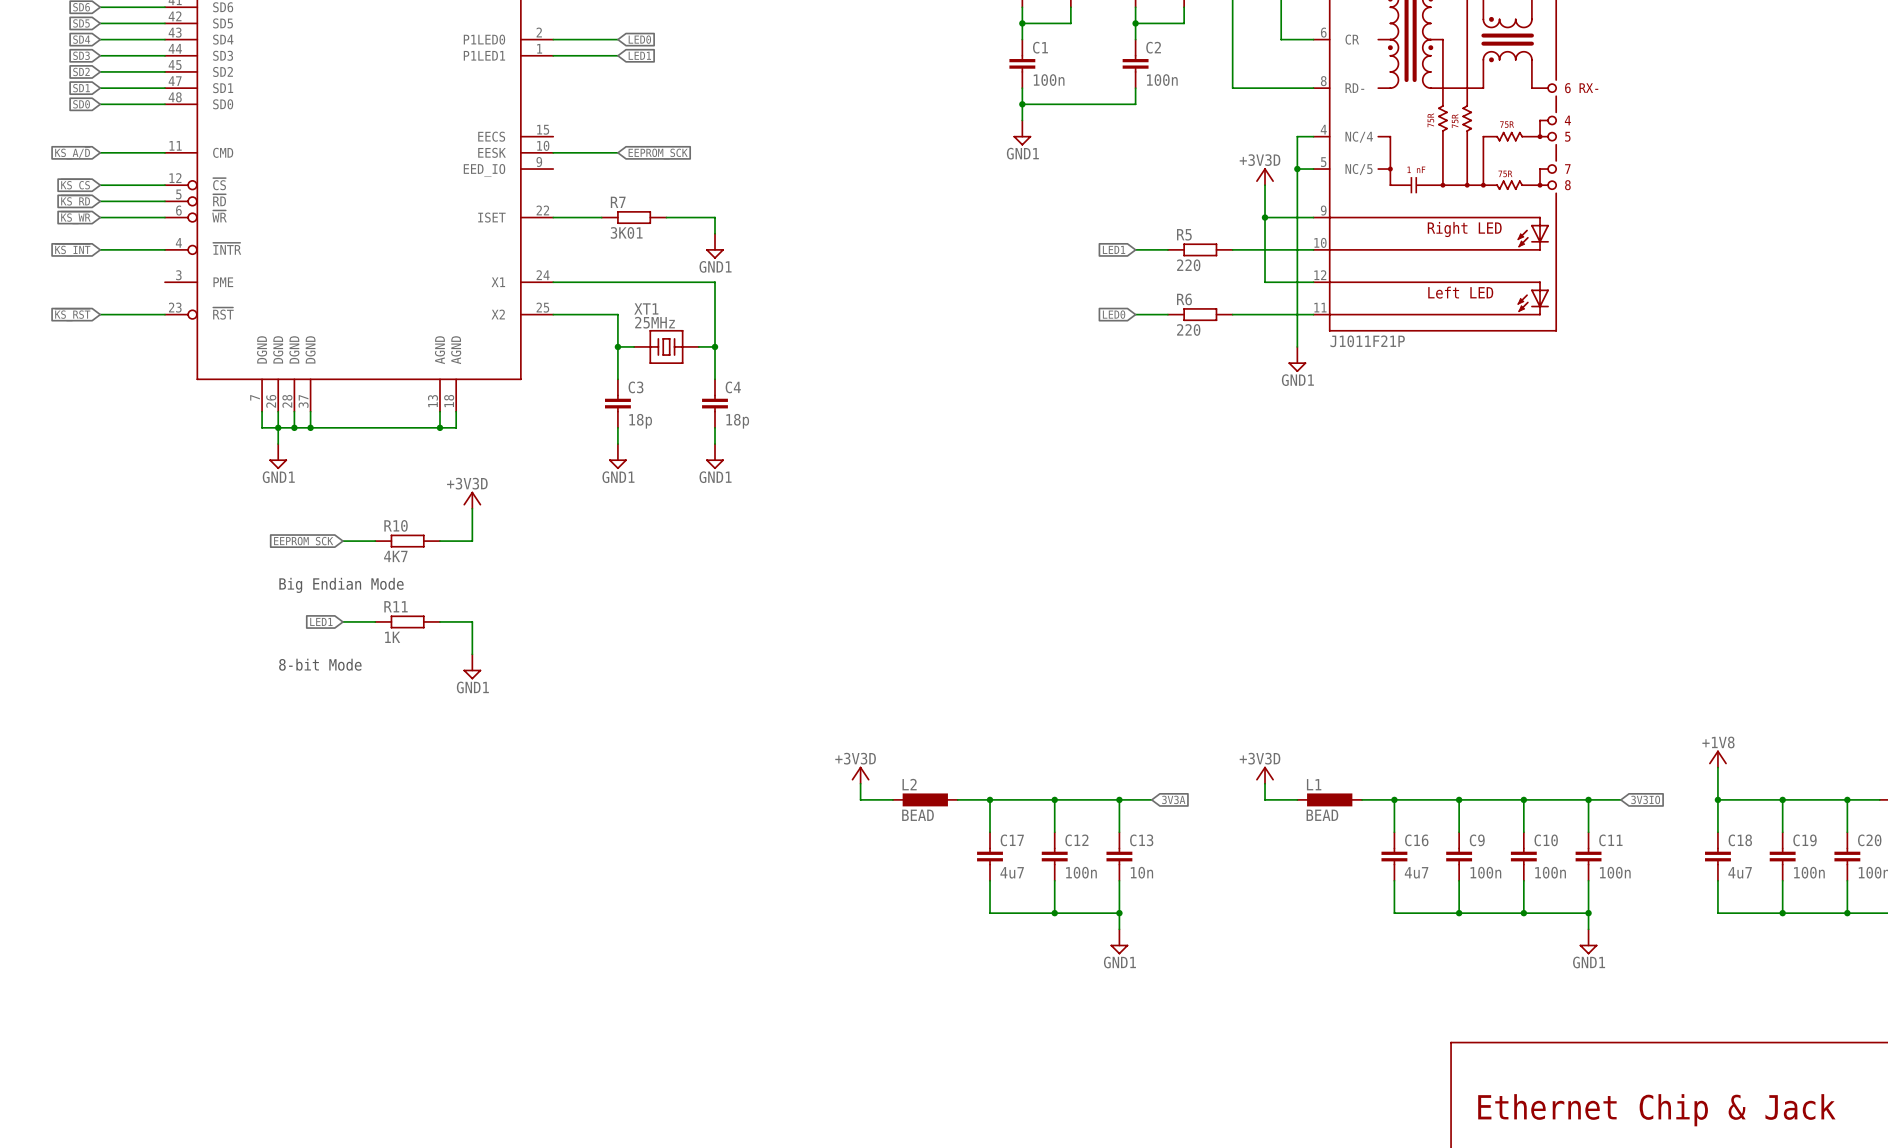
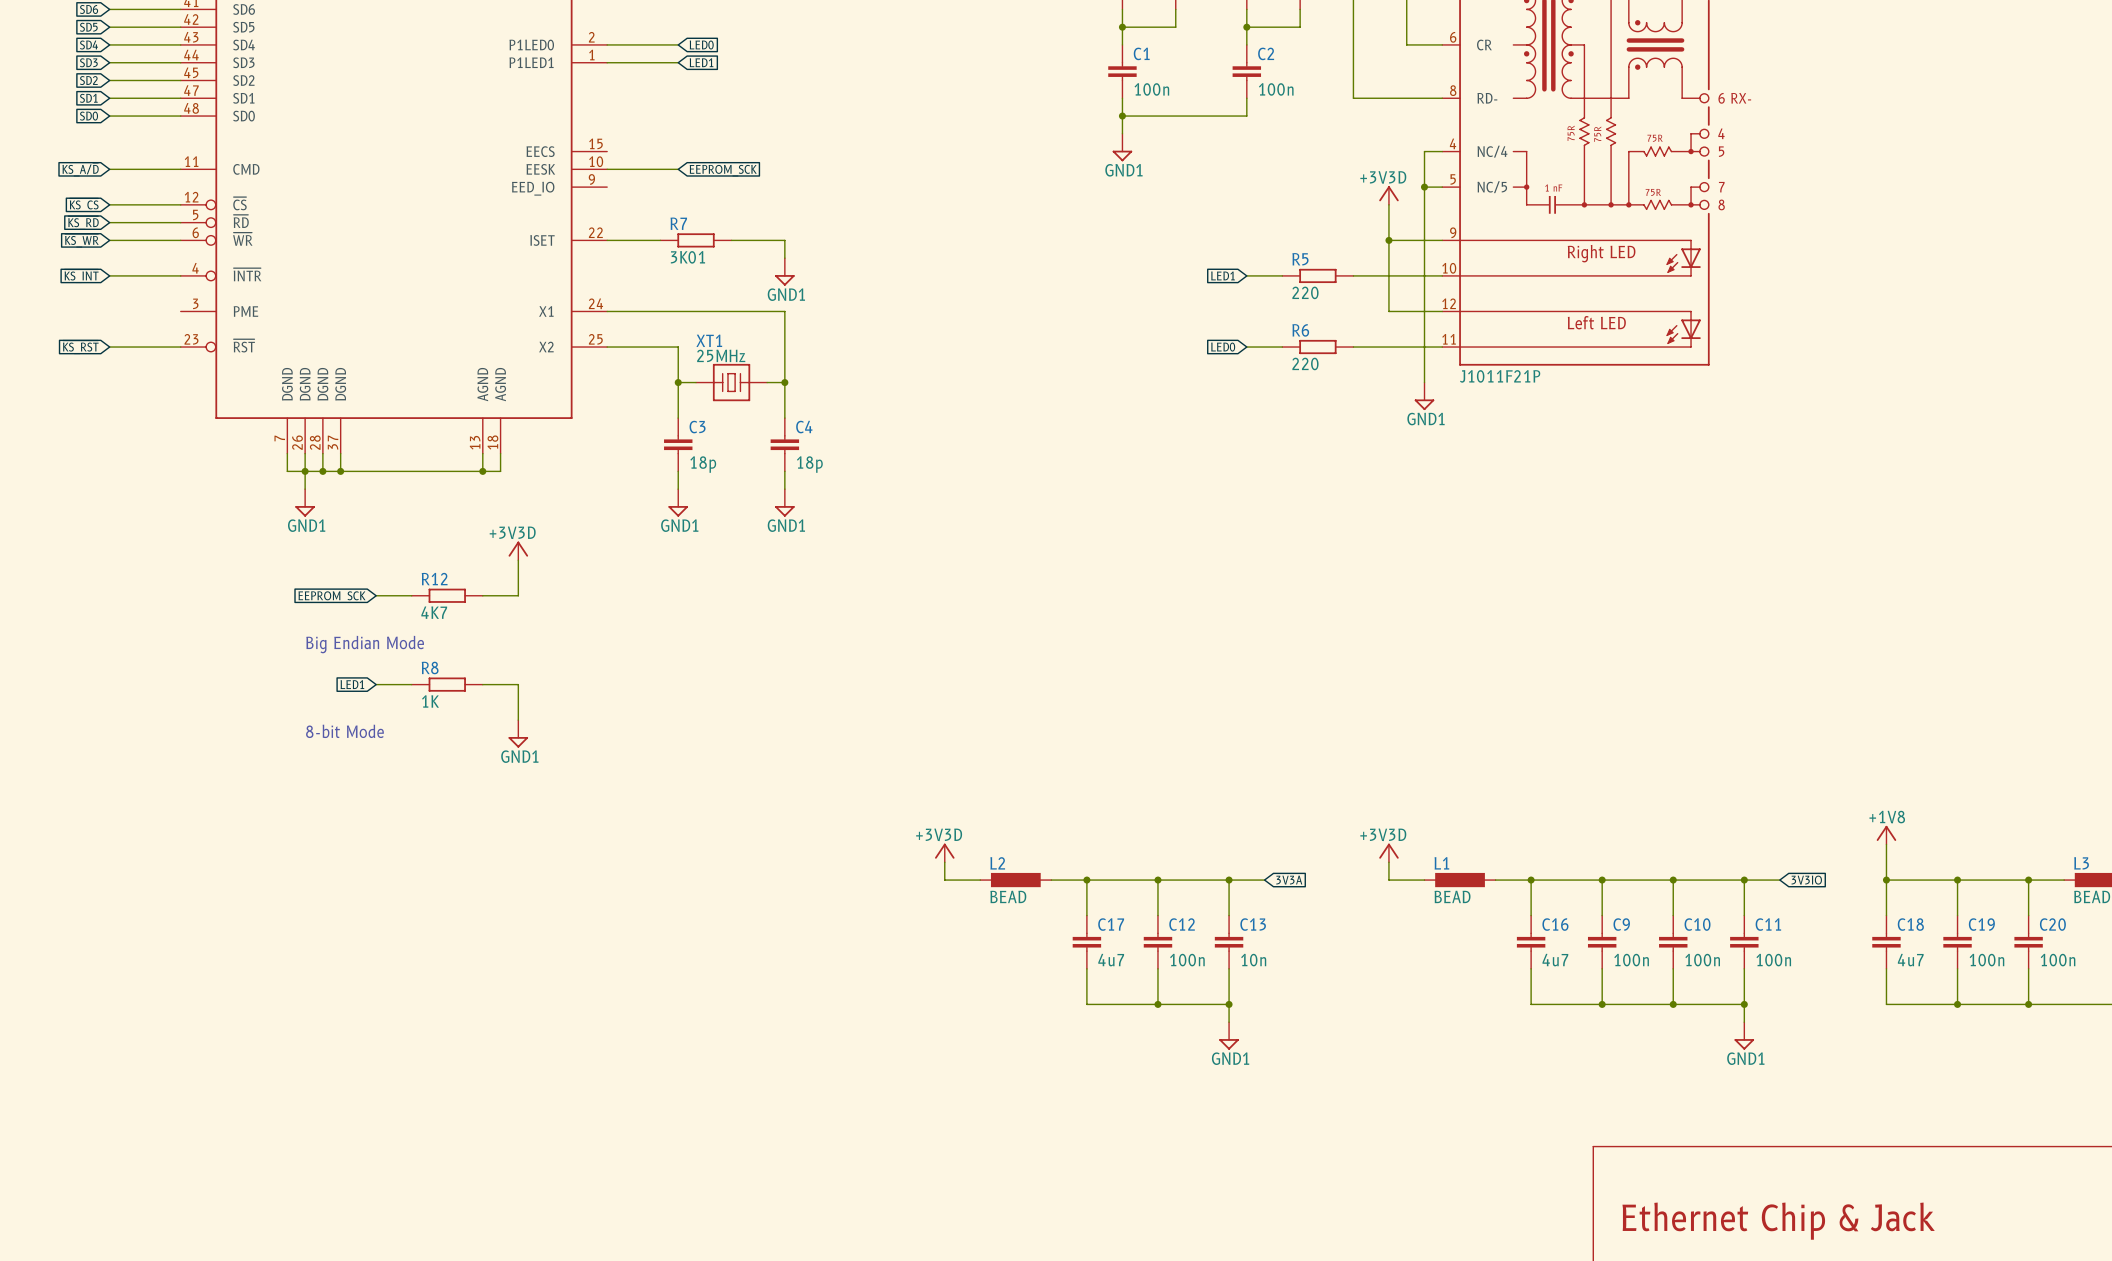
R10 name: R10 (396, 525) -> R12 (434, 579)
R11 name: R11 (396, 606) -> R8 (430, 667)

